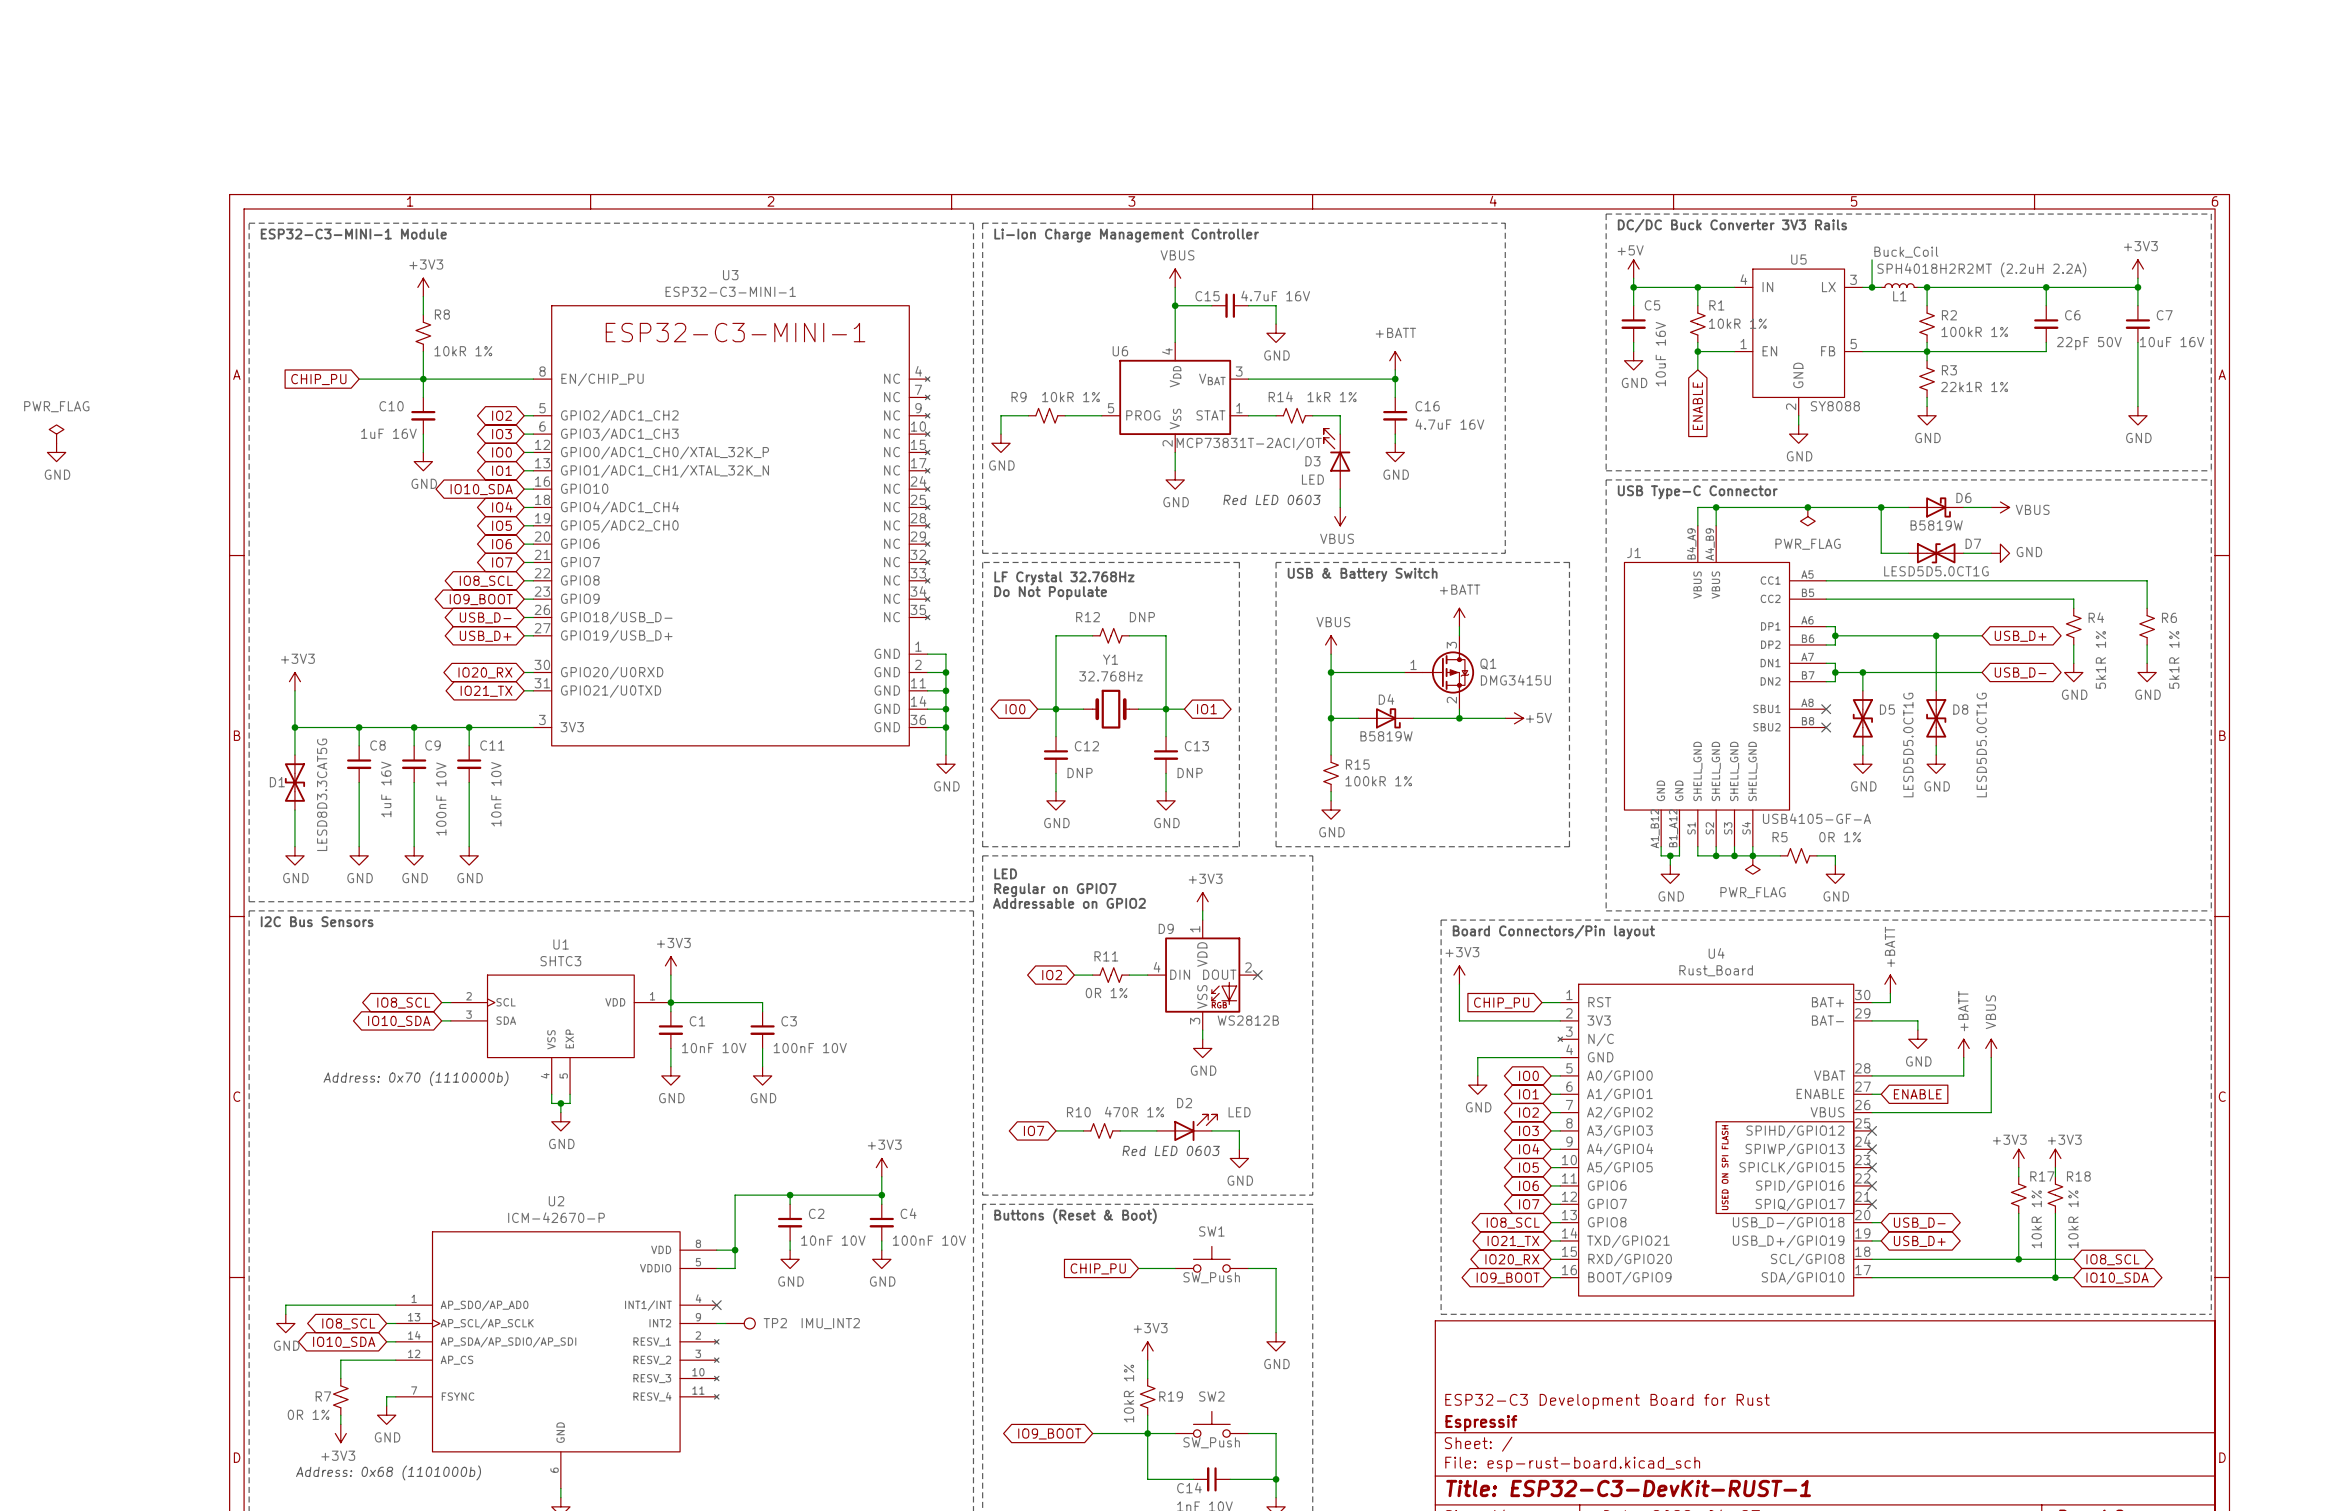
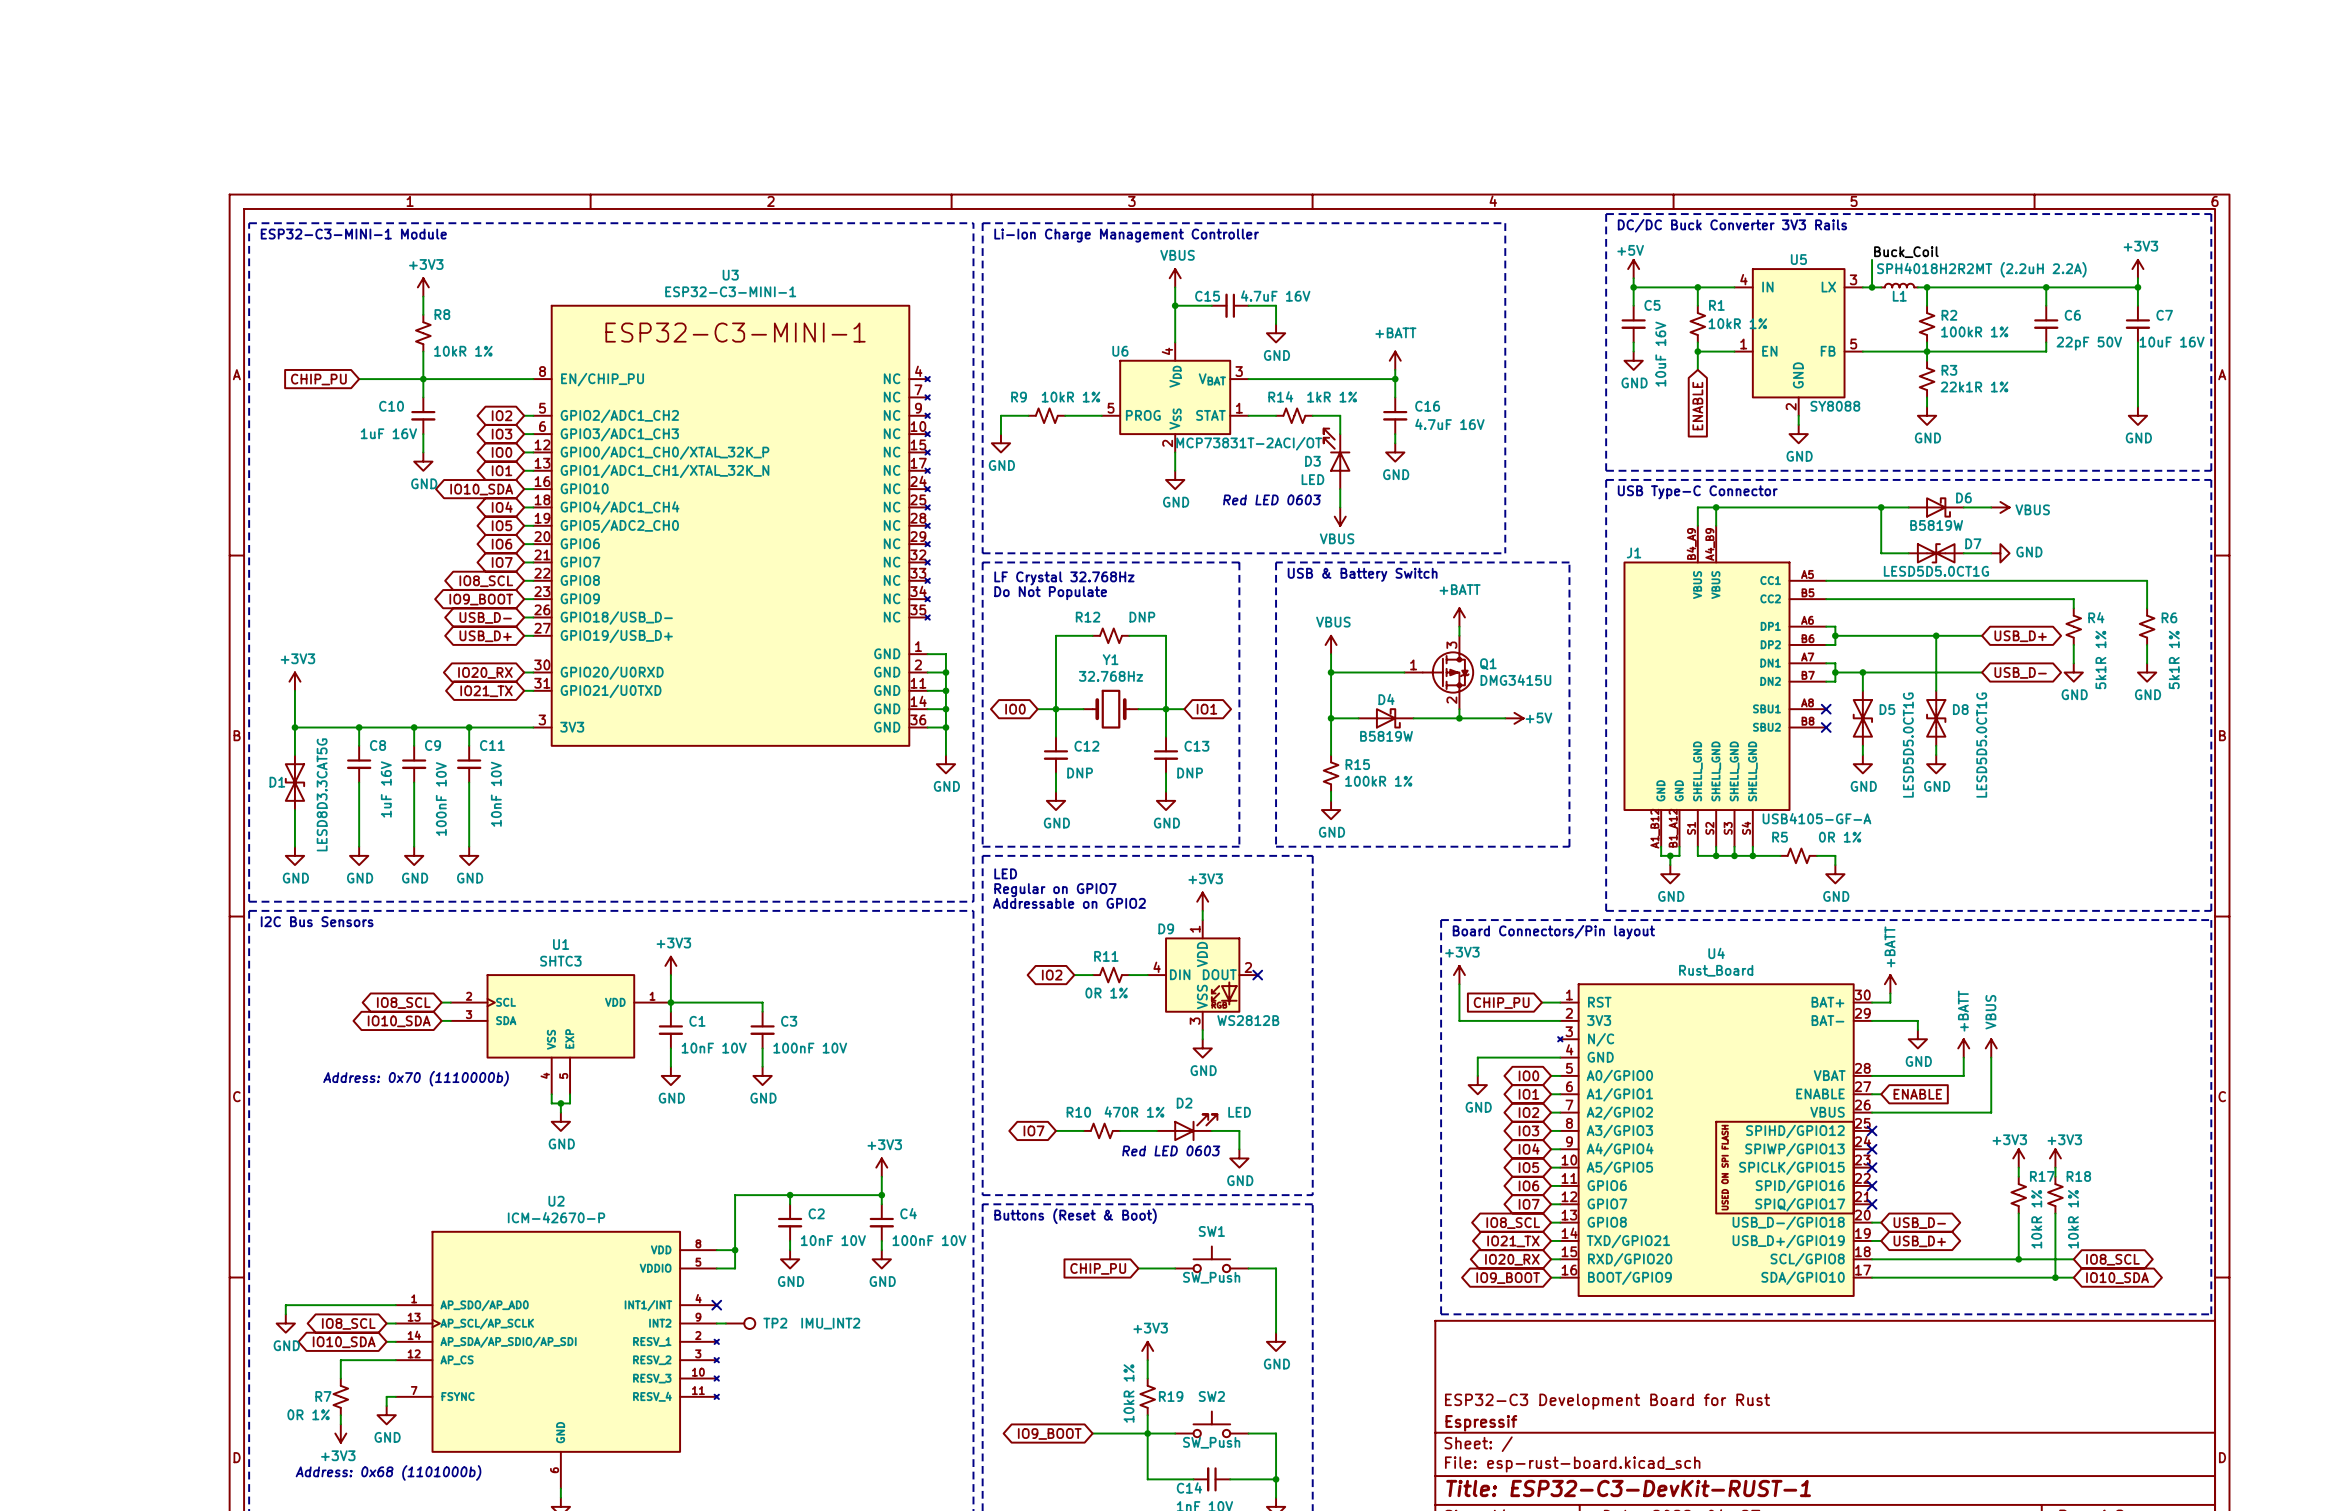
power symbol: PWR_FLAG (56, 434) -> none
power symbol: GND (56, 452) -> none
junction: (1807, 507) -> none
power symbol: PWR_FLAG (1807, 516) -> none
power symbol: PWR_FLAG (1752, 865) -> none

